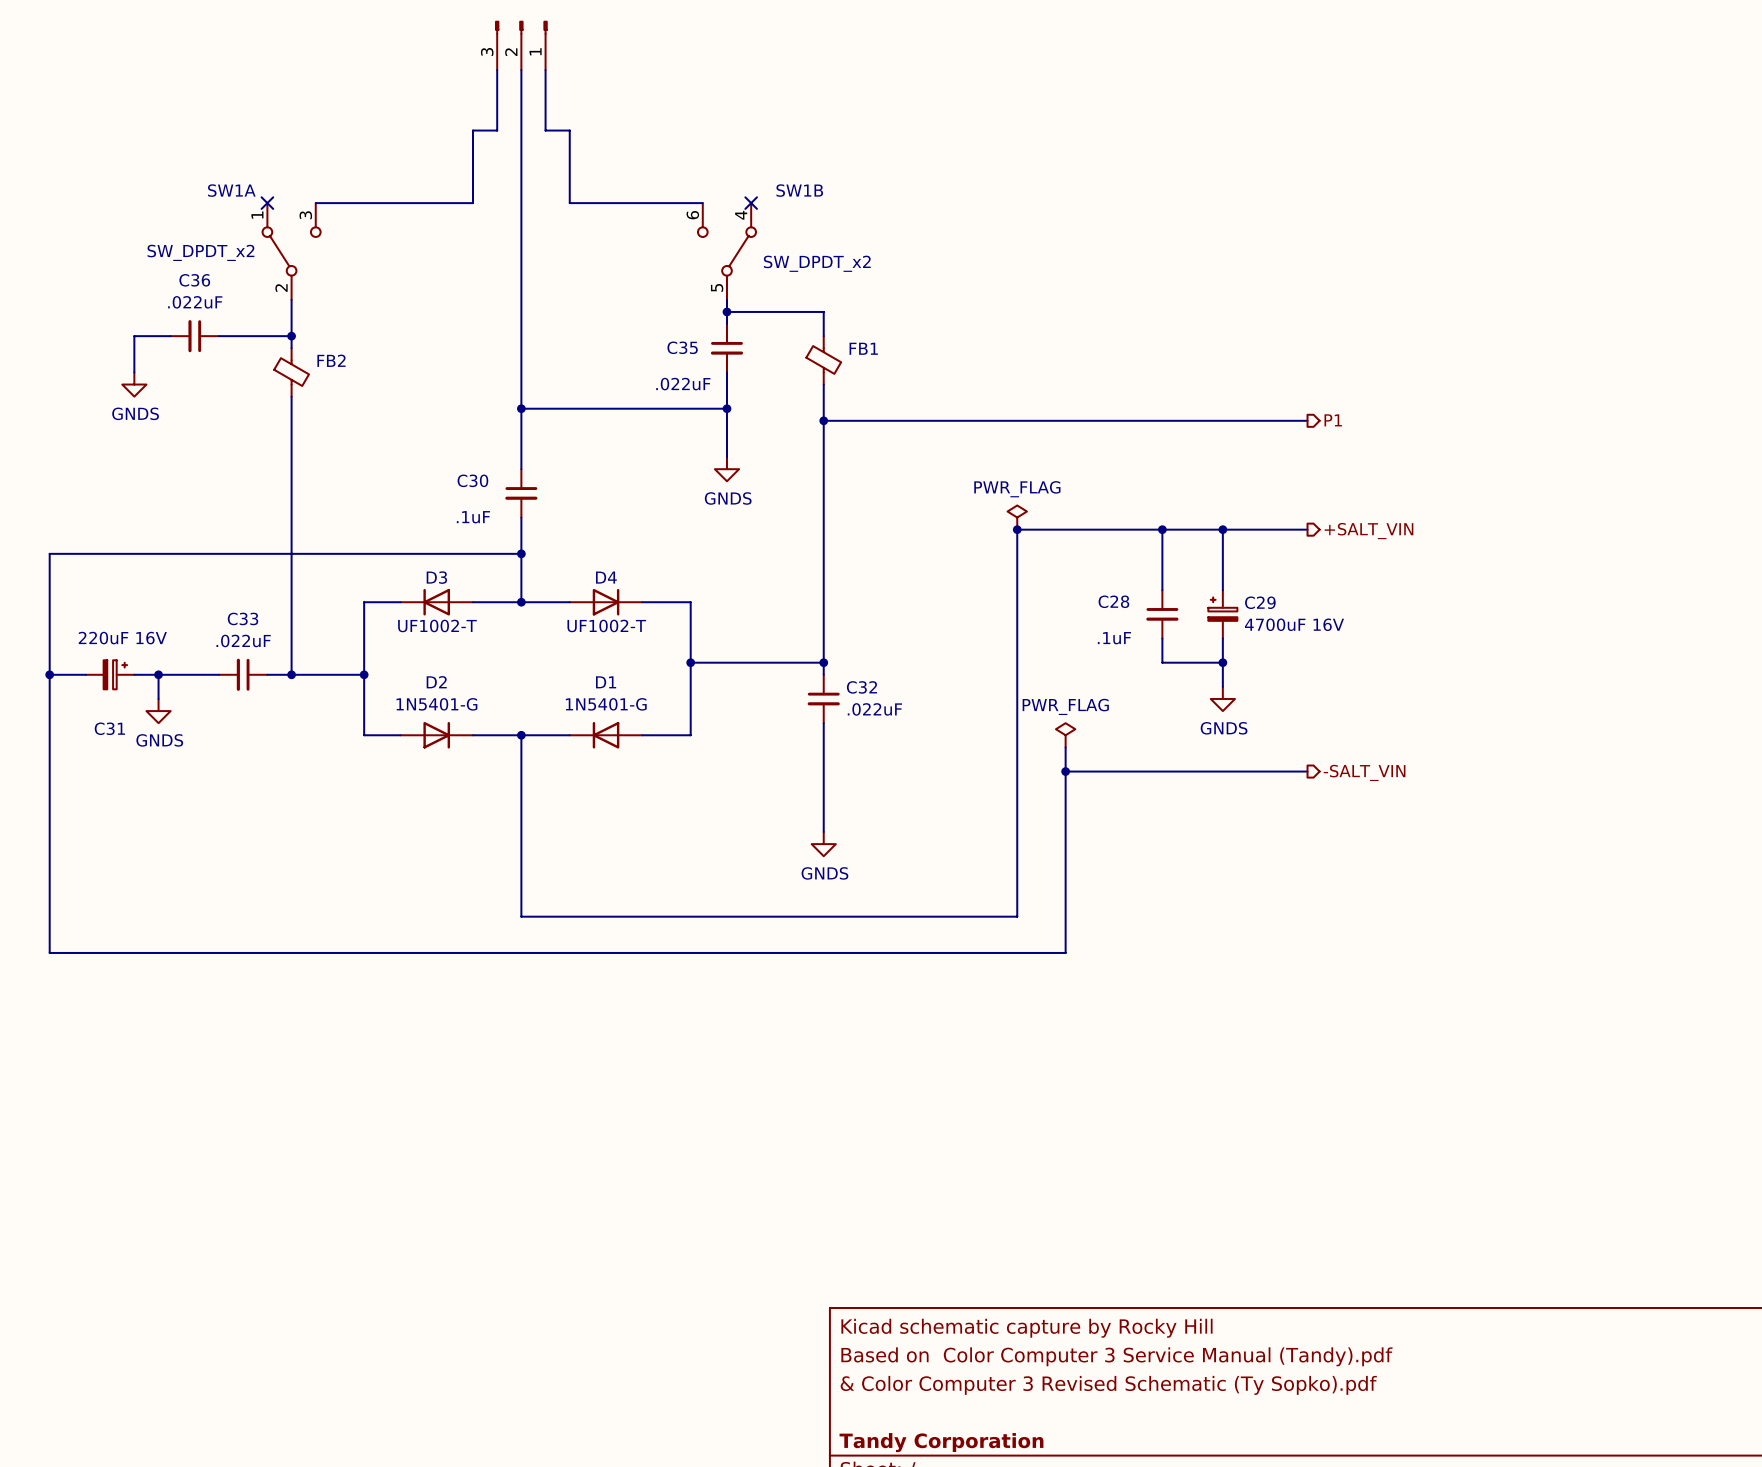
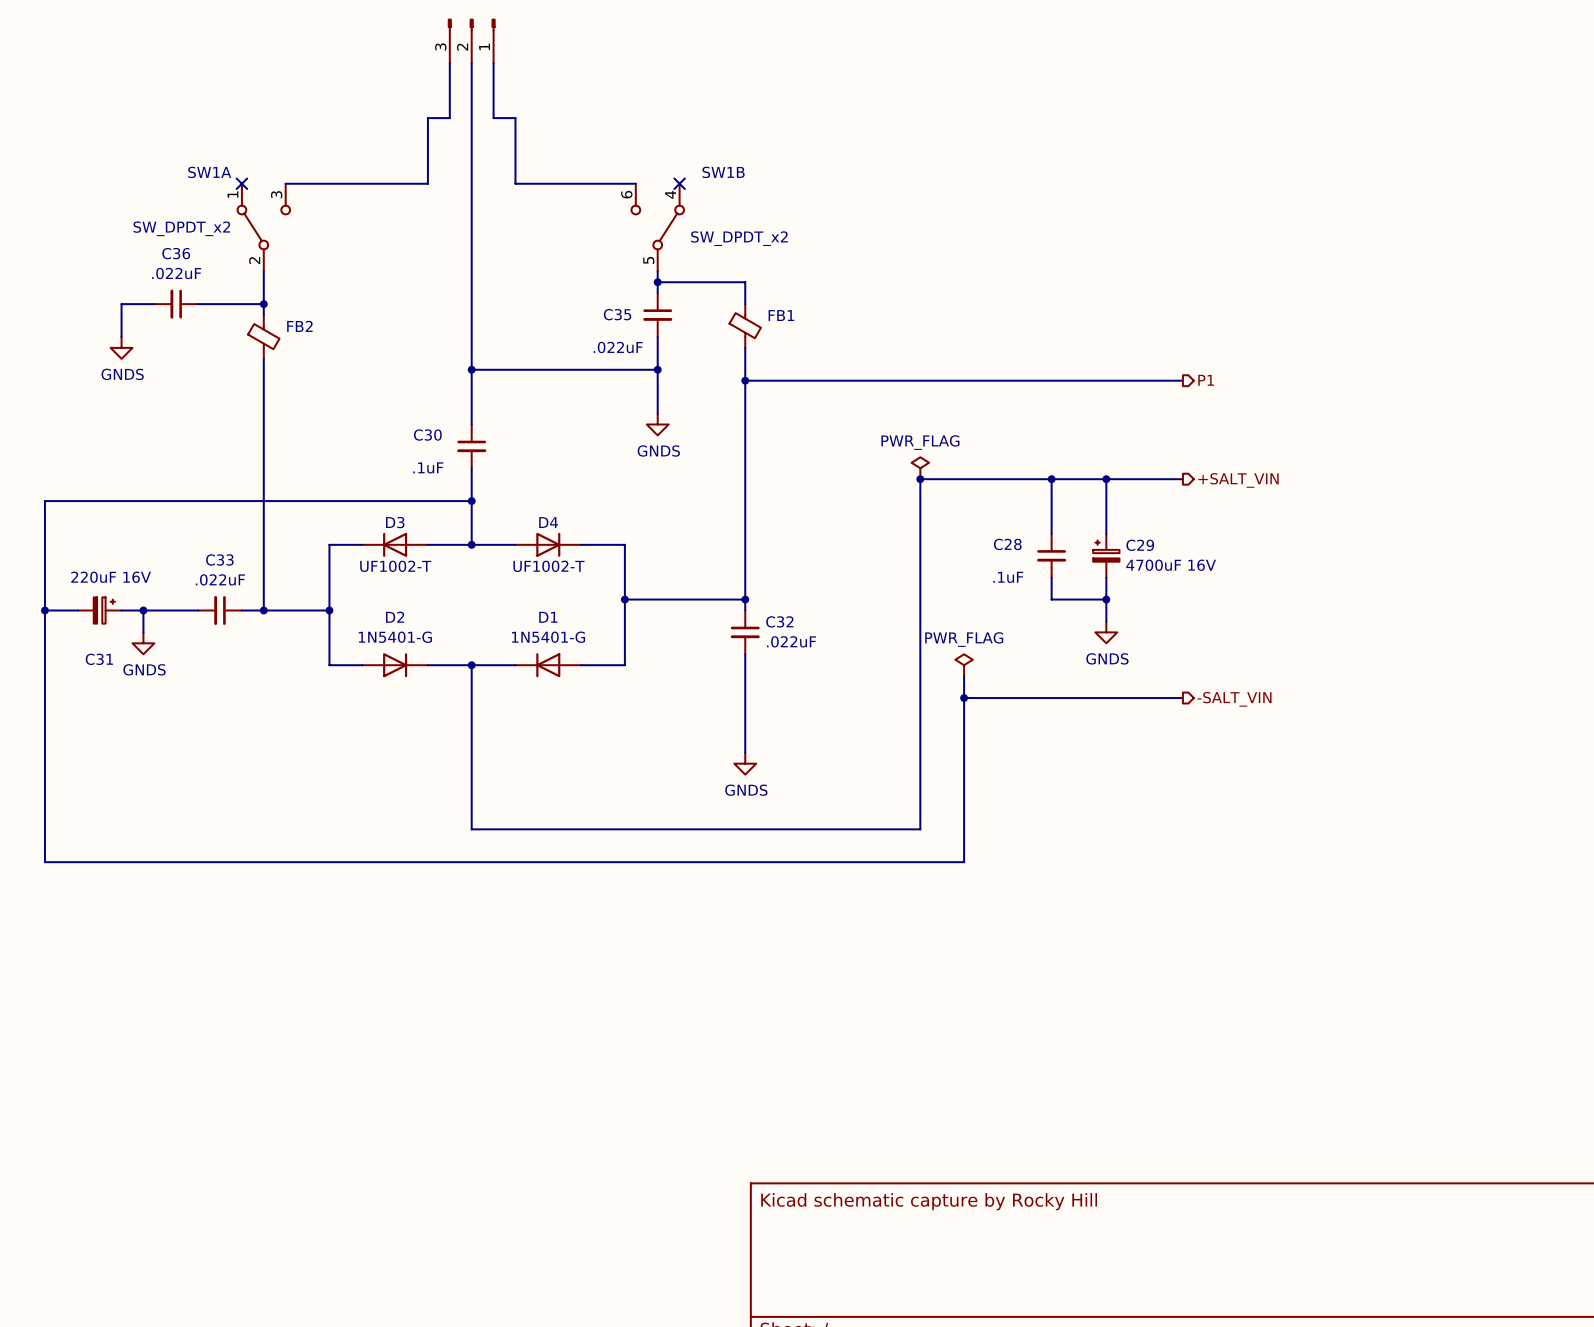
title block: Based on Color Computer 3 Service Manual (Tandy).pdf (1116, 1356) -> none
title block: & Color Computer 3 Revised Schematic (Ty Sopko).pdf (1108, 1385) -> none
title block: Tandy Corporation (941, 1442) -> none

